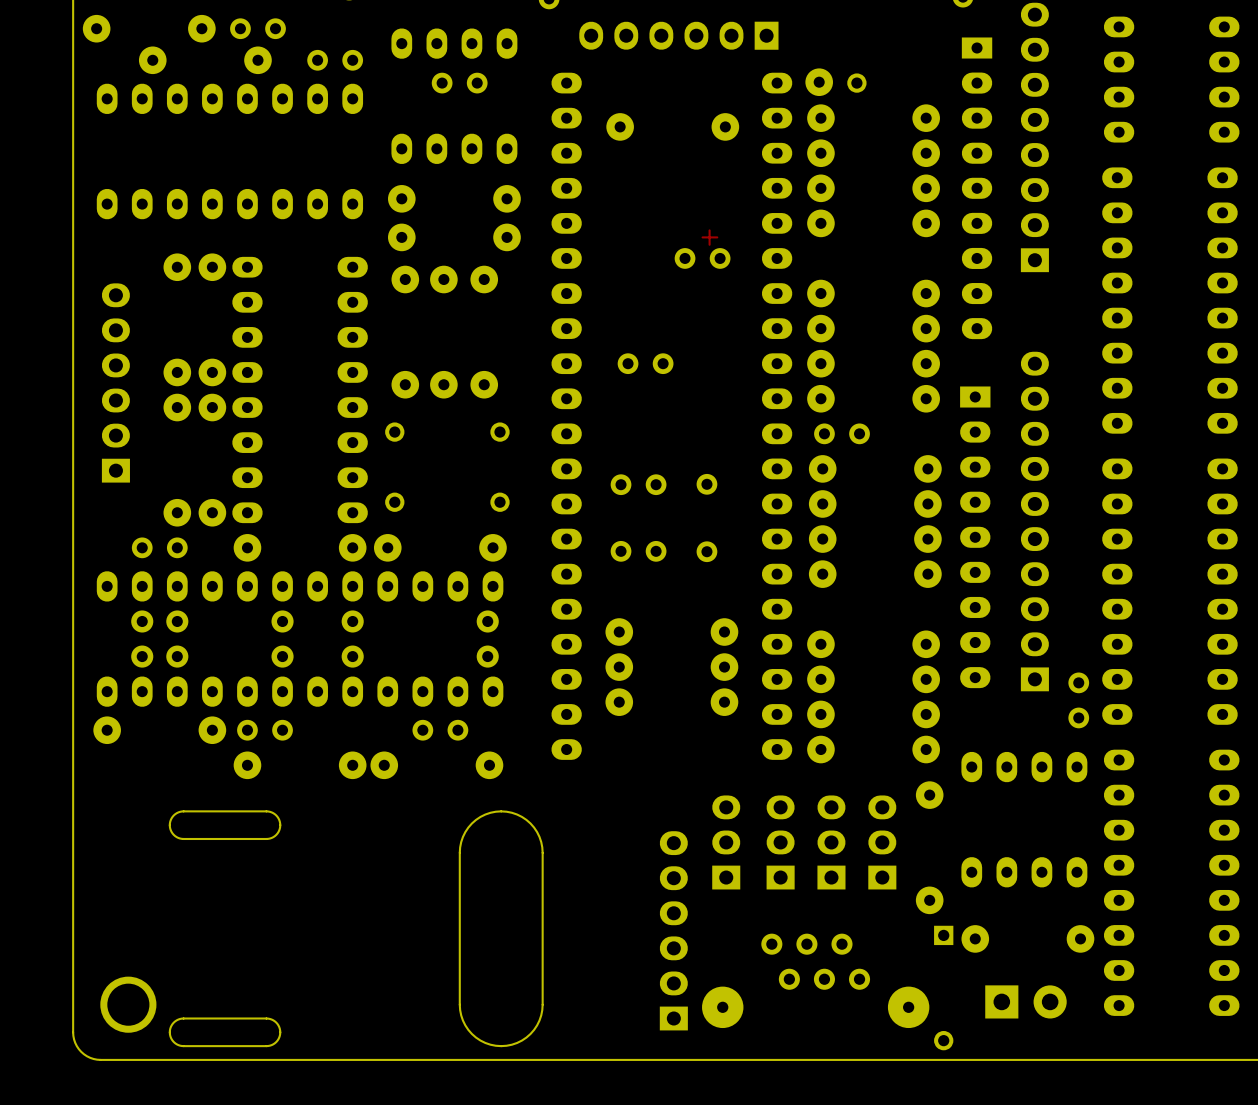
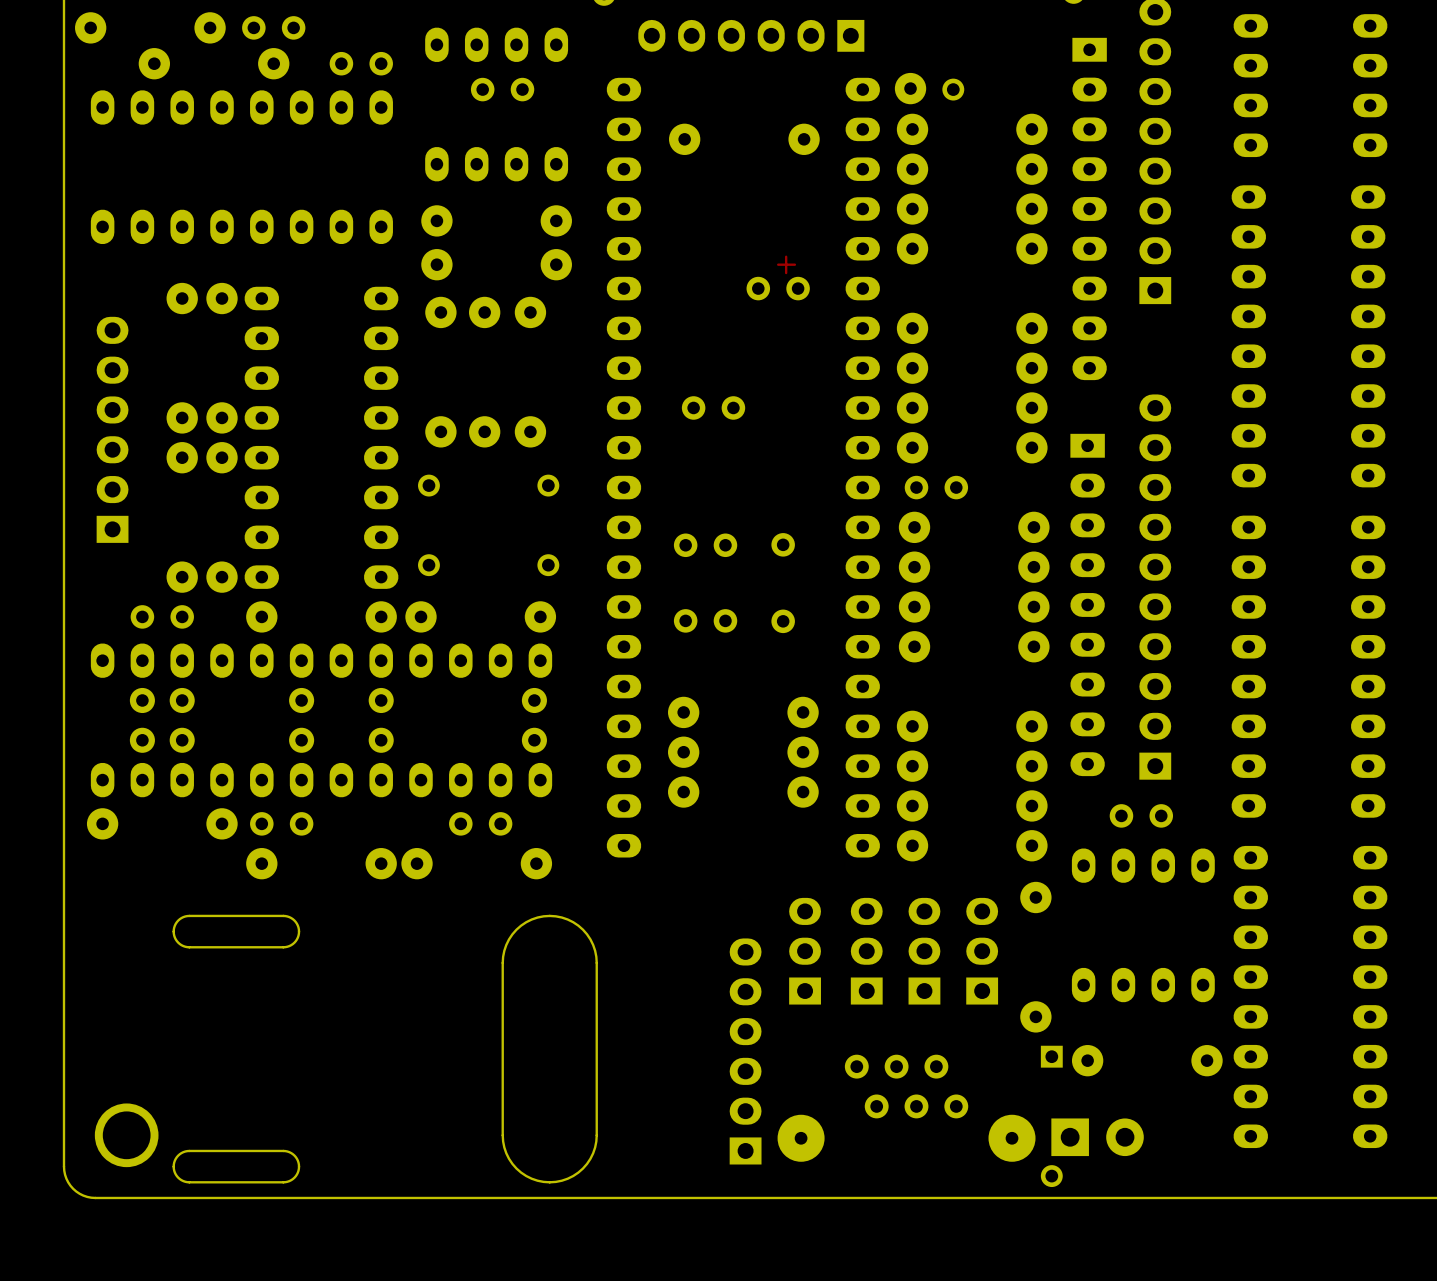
part rotation: 0° (1078, 700) -> 90° clockwise (1141, 815)
part position: (1078, 700) -> (1141, 815)
part position: (1025, 1001) -> (1097, 1137)

